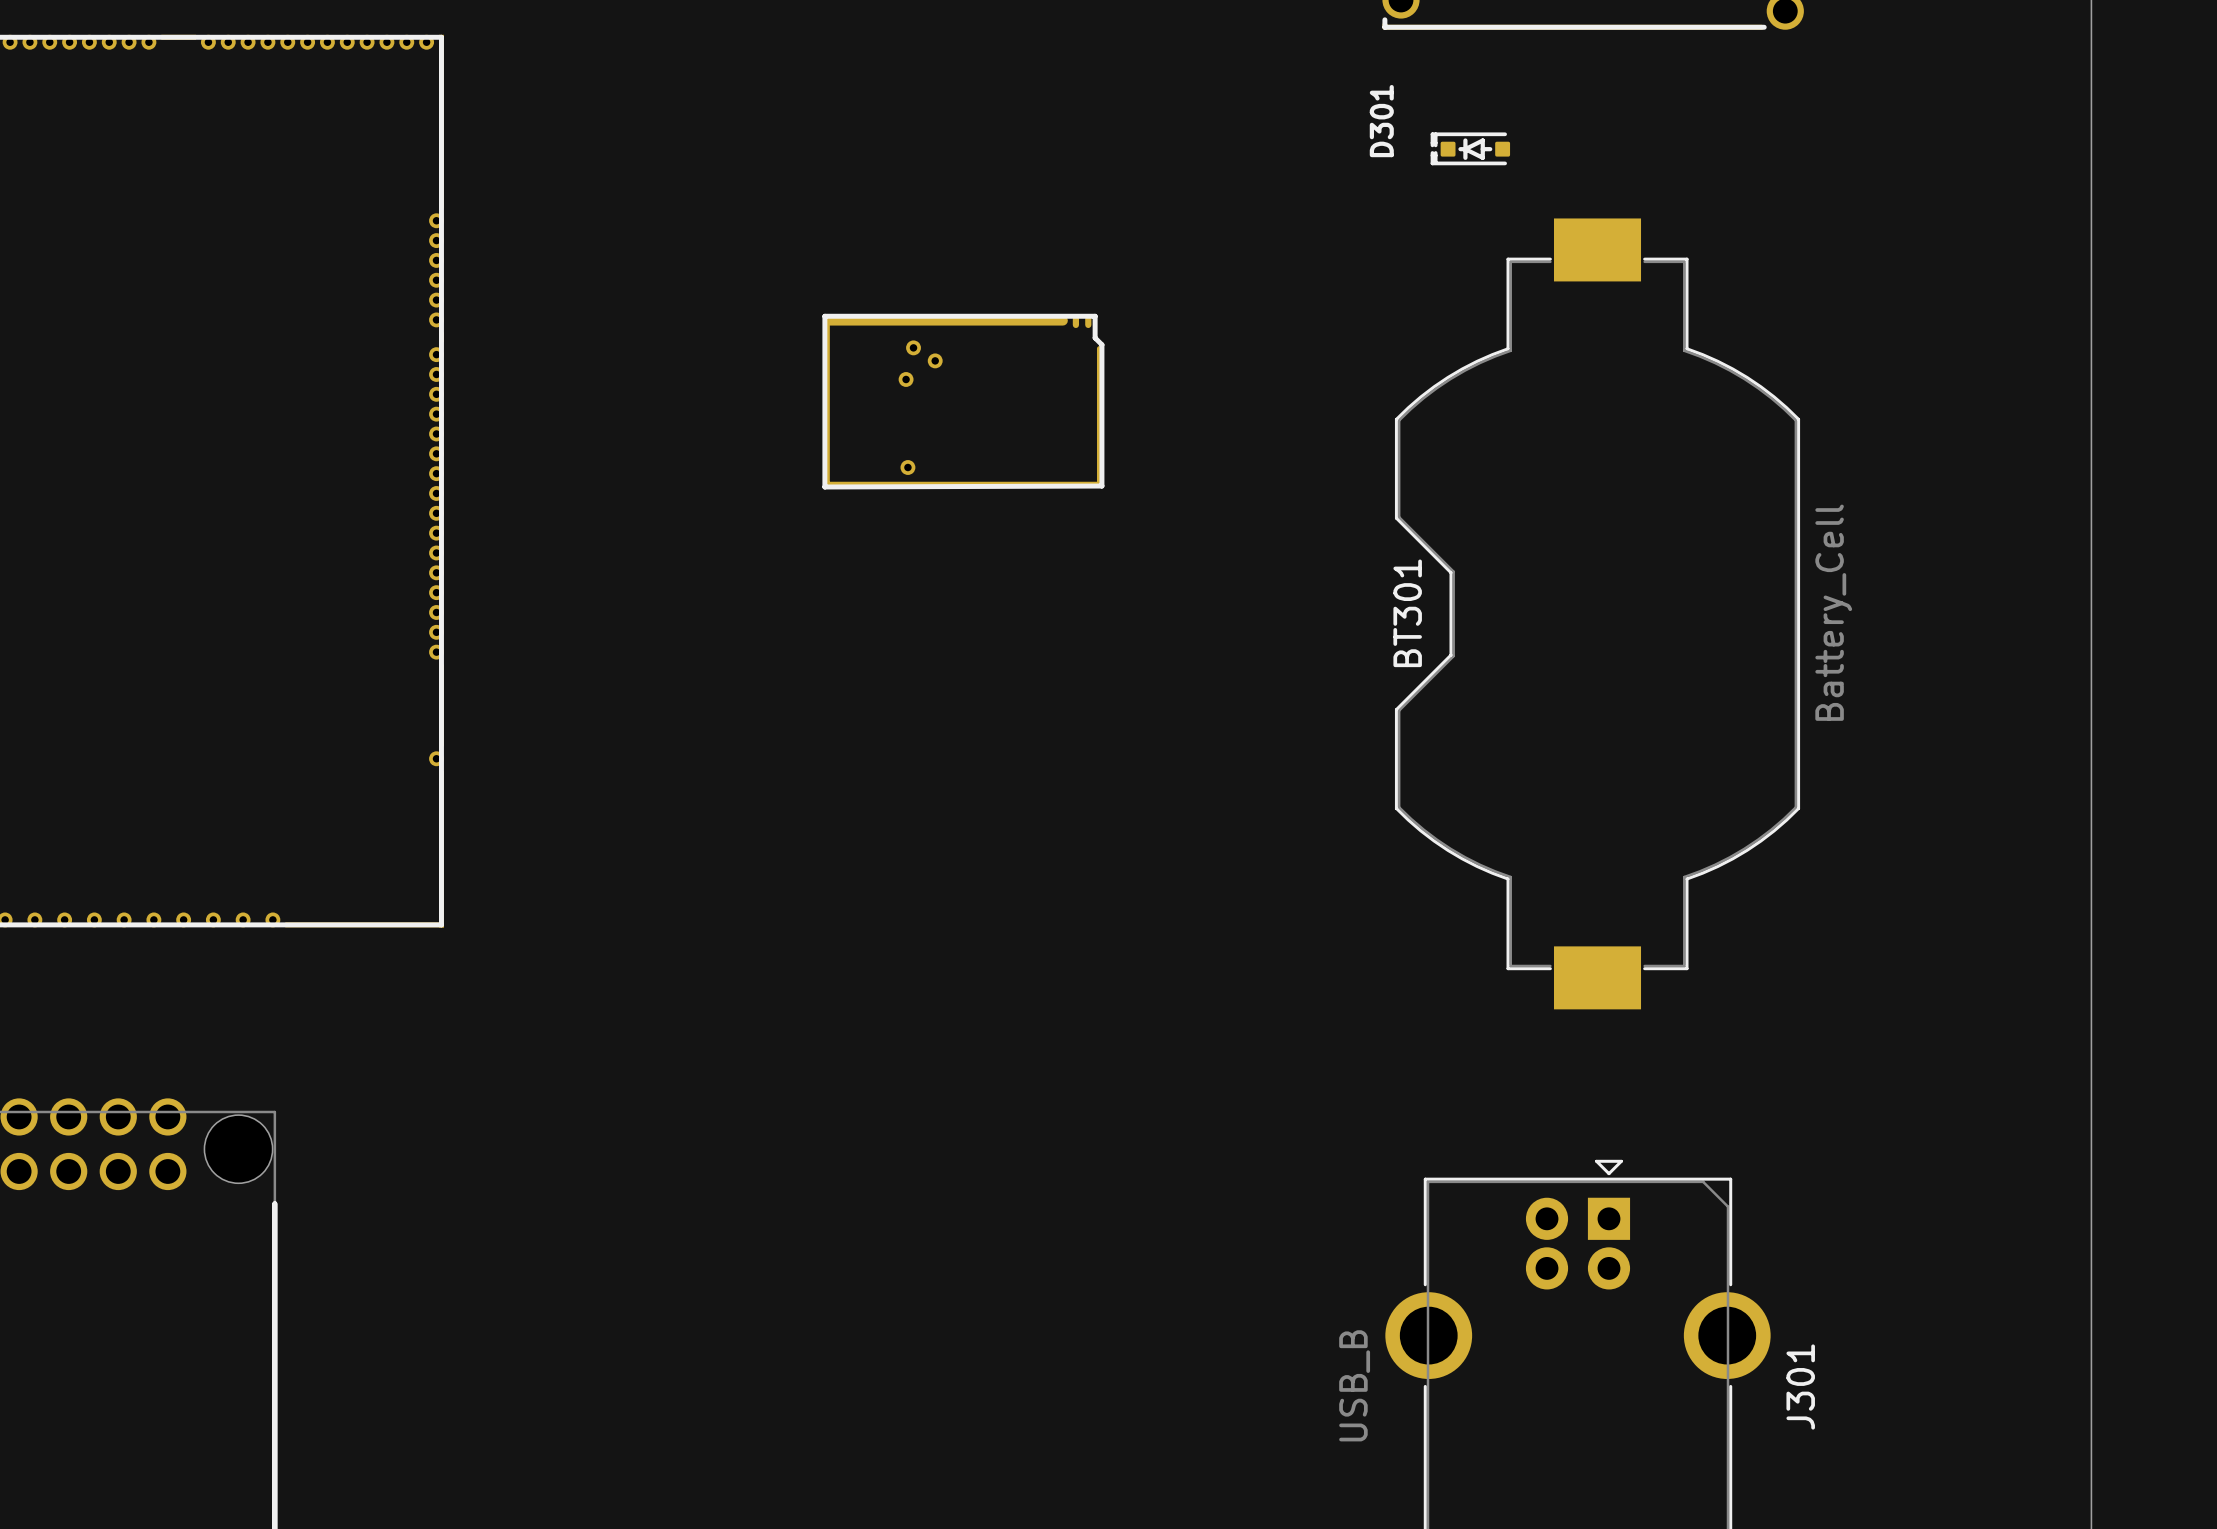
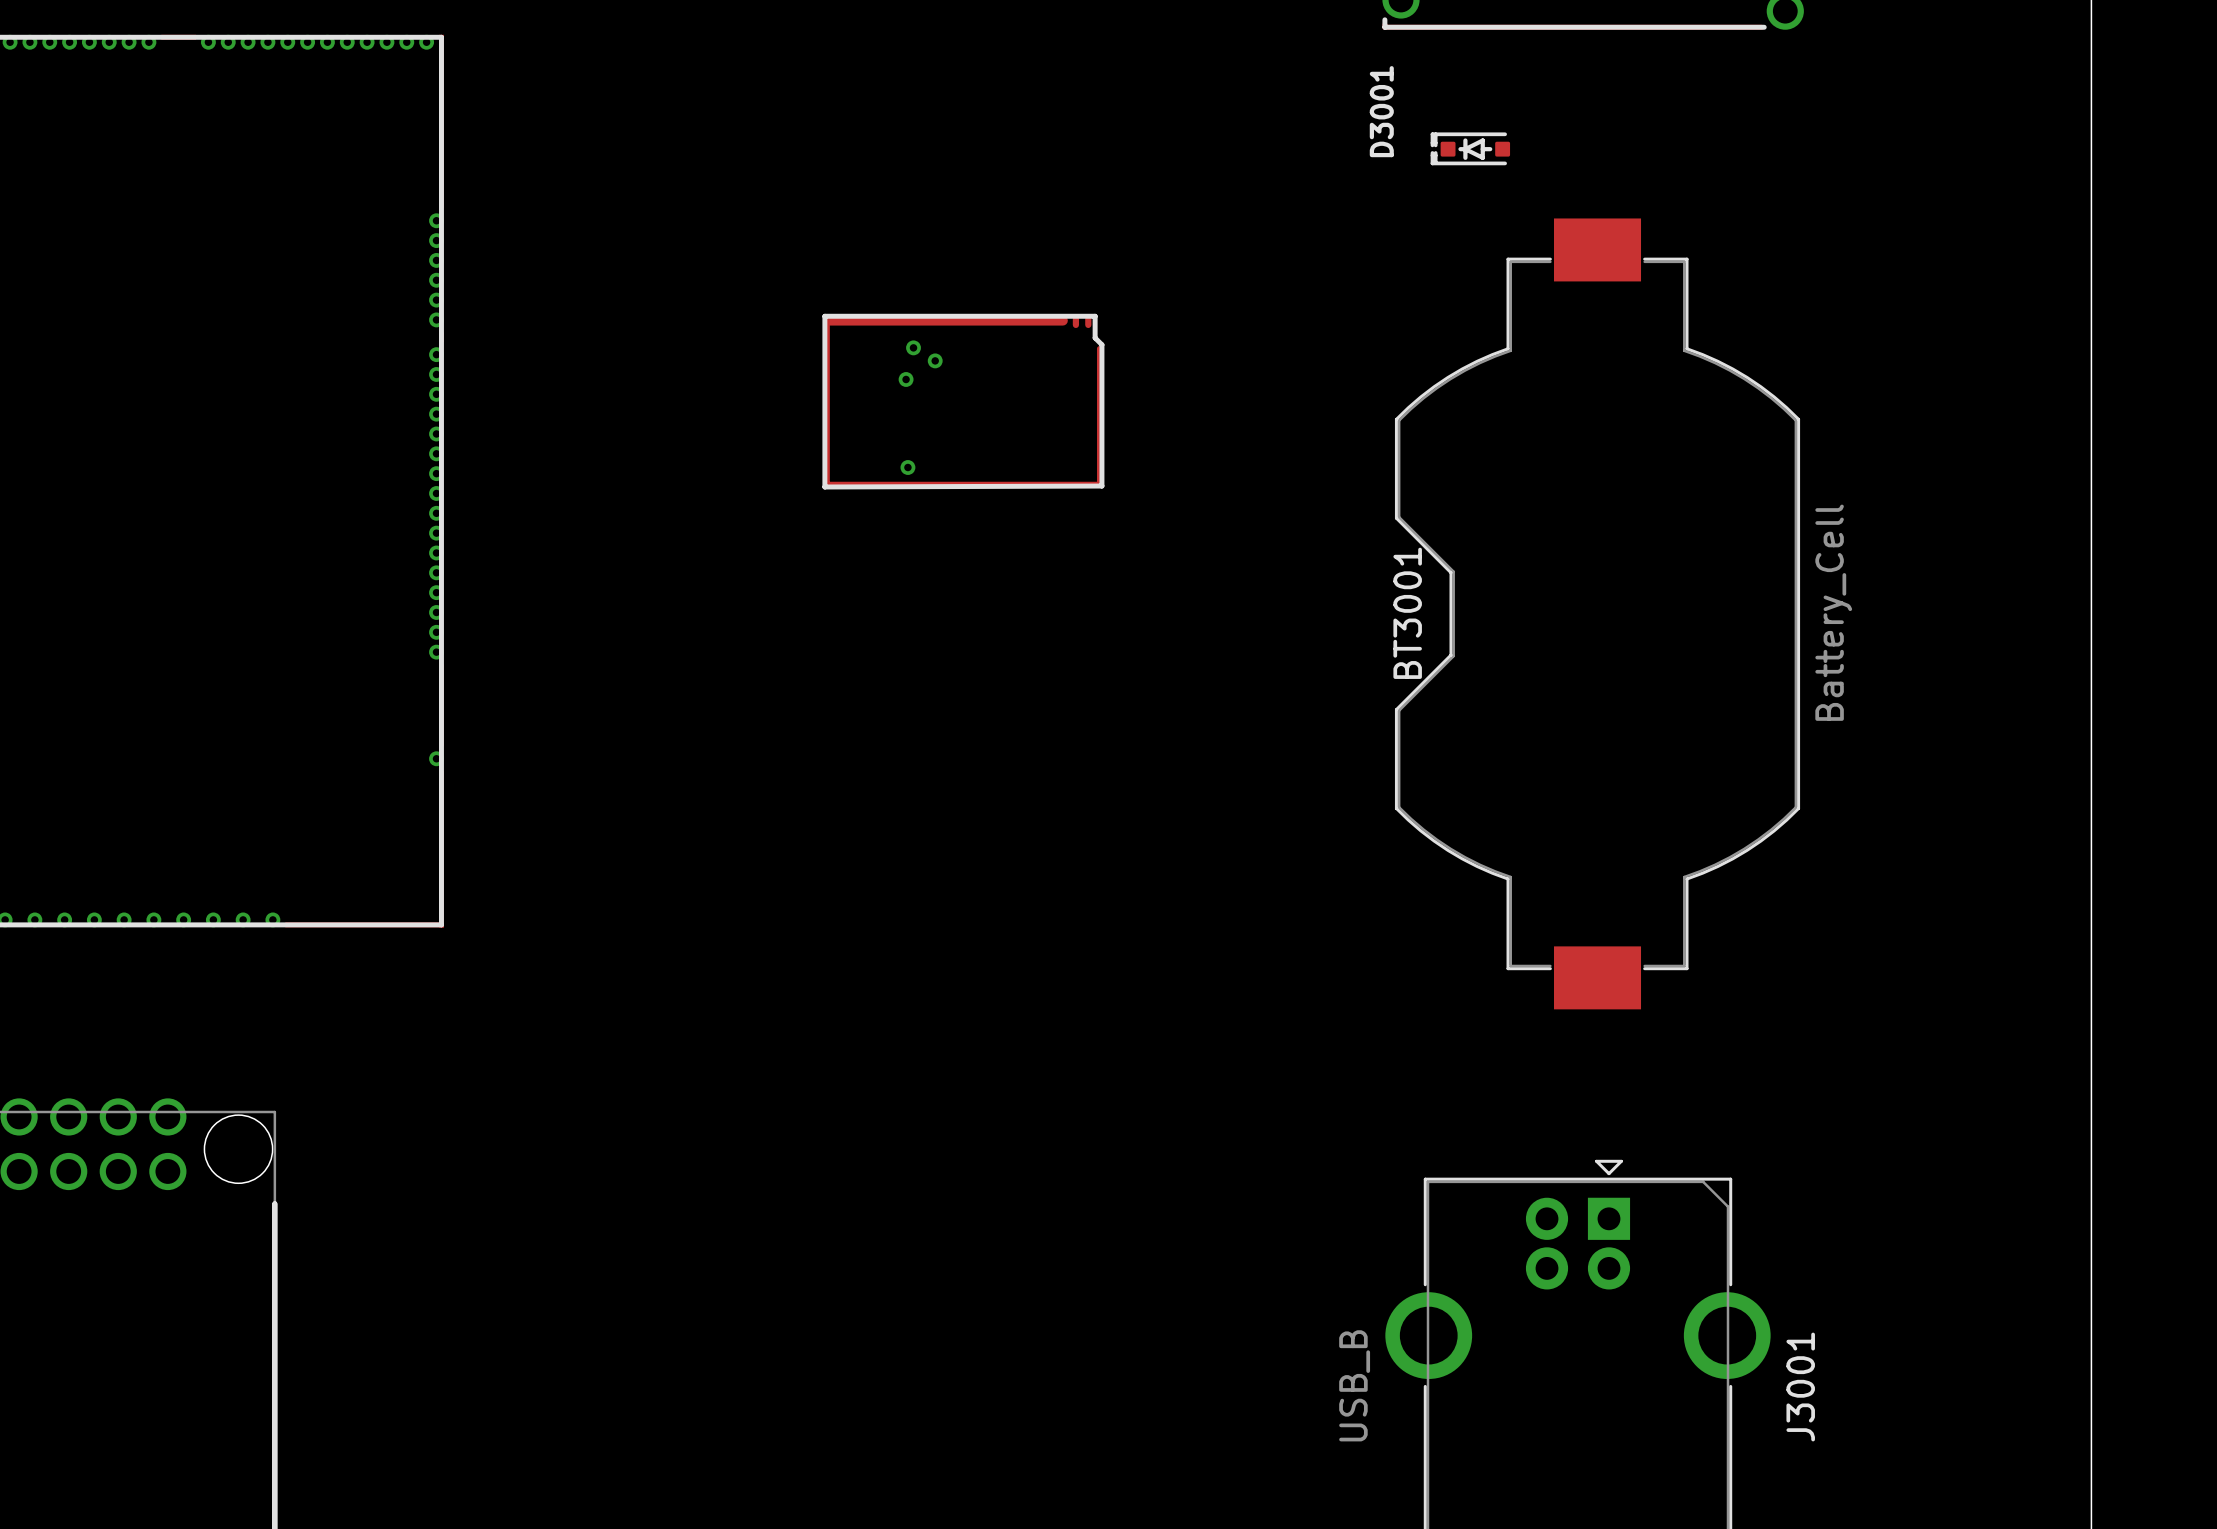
D301 name: D301 (1381, 121) -> D3001 (1381, 111)
BT301 name: BT301 (1407, 613) -> BT3001 (1407, 613)
J301 name: J301 (1800, 1387) -> J3001 (1800, 1387)

